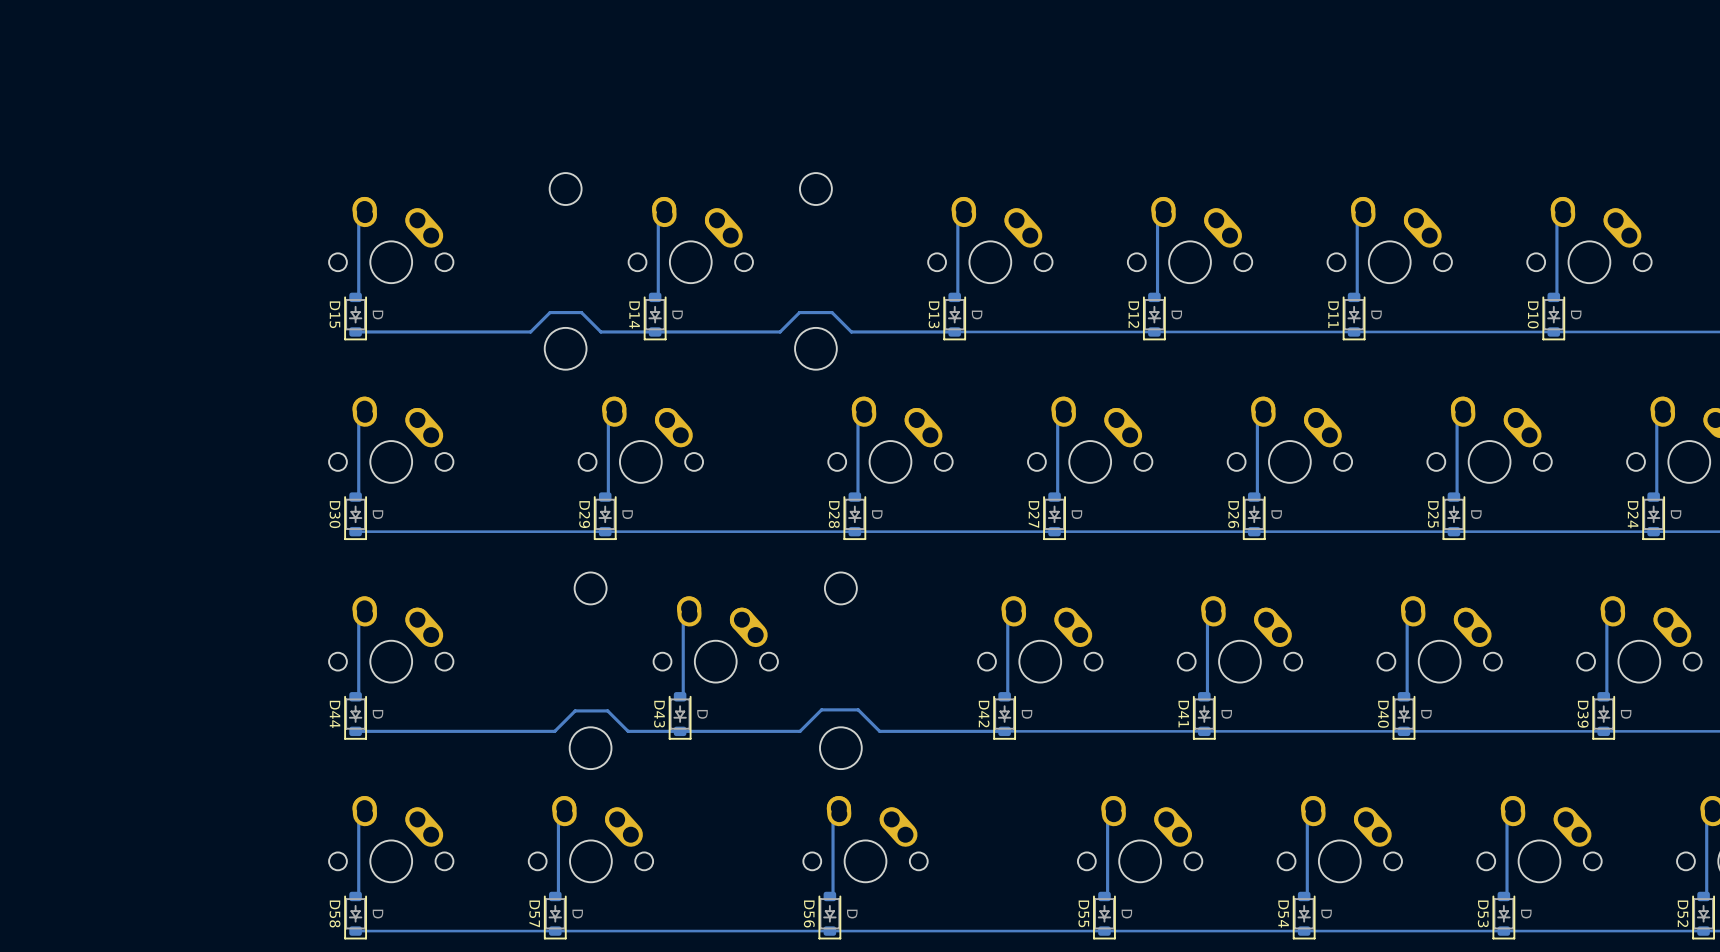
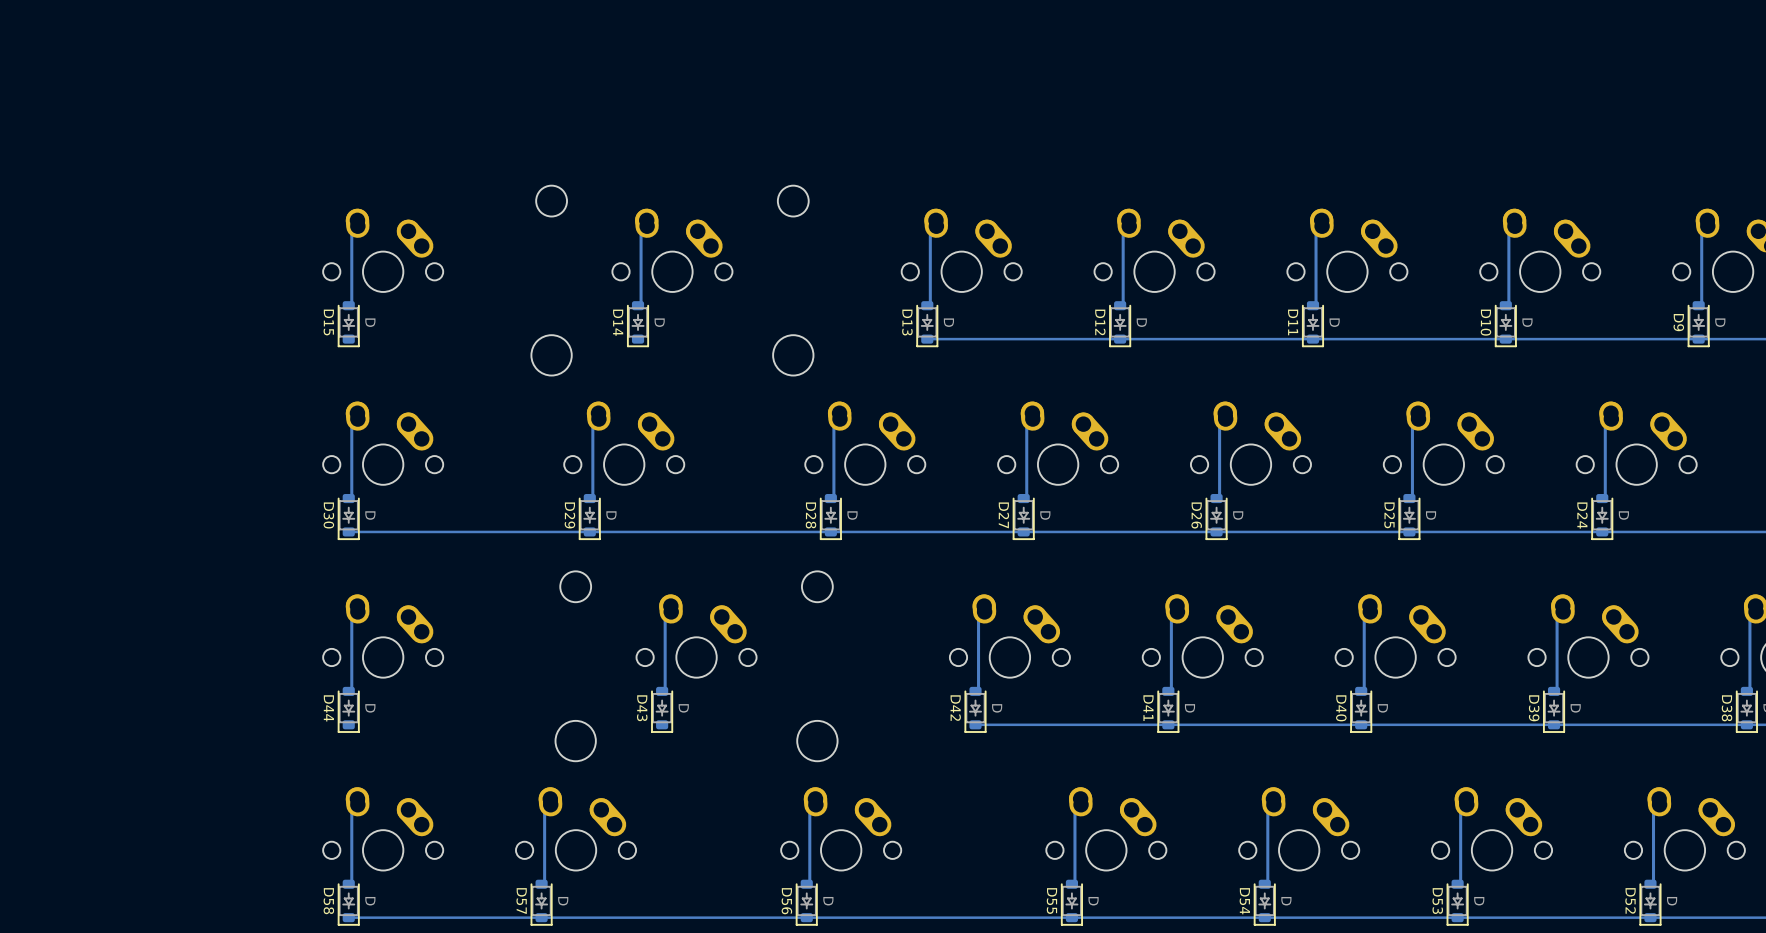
track: (954, 331) (851, 331) (832, 312) (799, 312) (780, 331) (600, 331) (581, 312) (550, 312) (530, 331) (355, 331) -> none
track: (1004, 731) (879, 731) (858, 709) (821, 709) (800, 731) (628, 731) (607, 710) (575, 710) (554, 731) (355, 731) -> none

